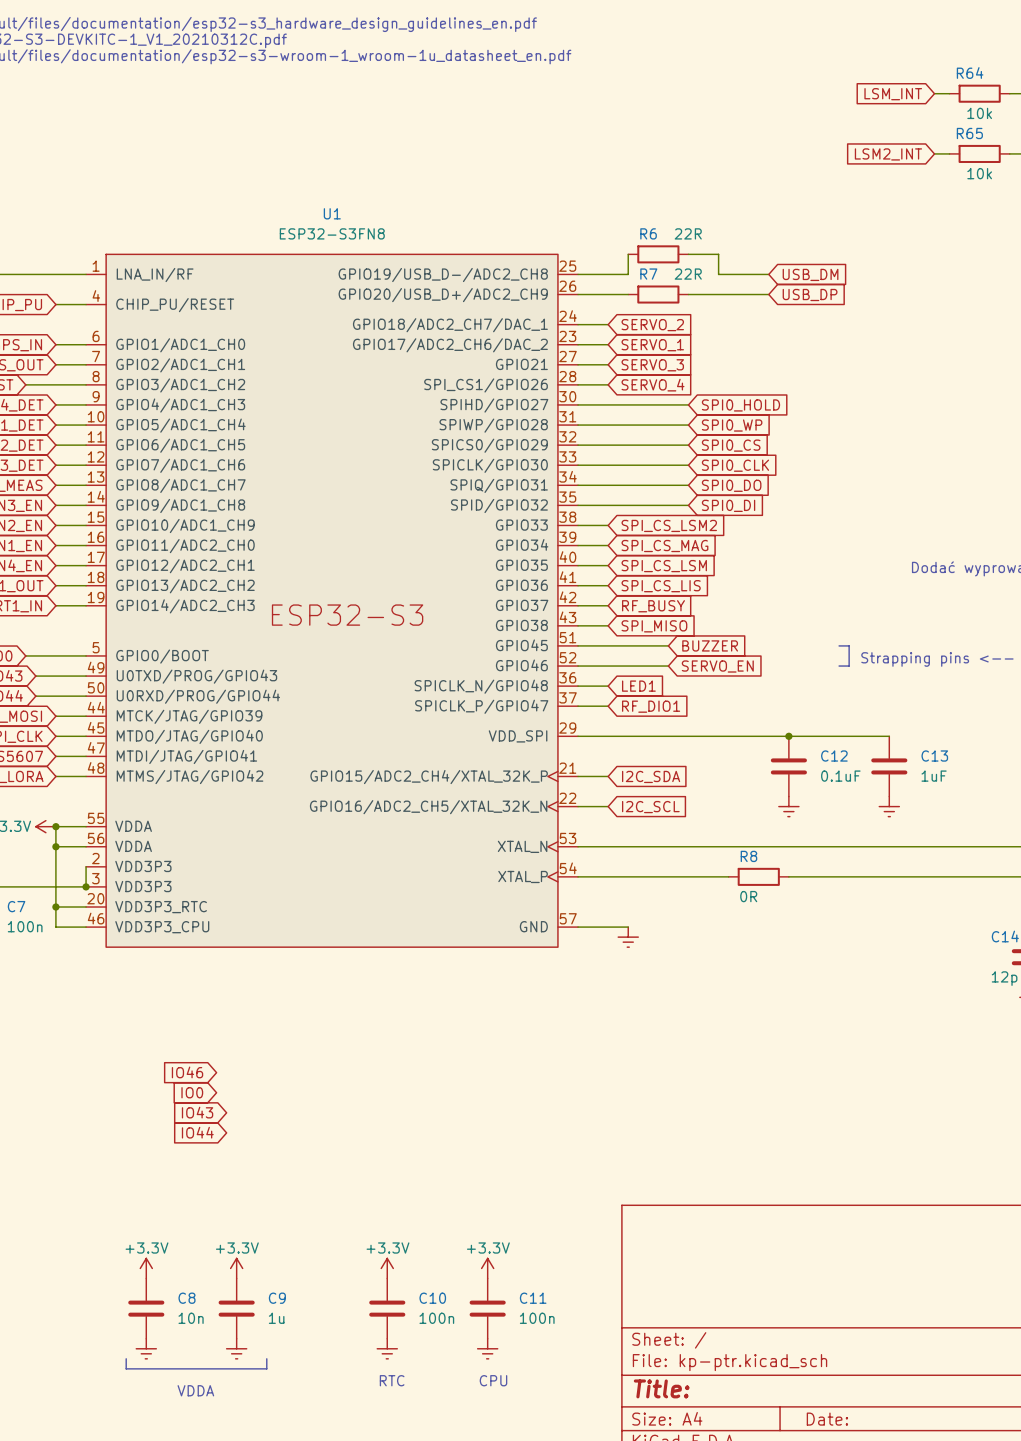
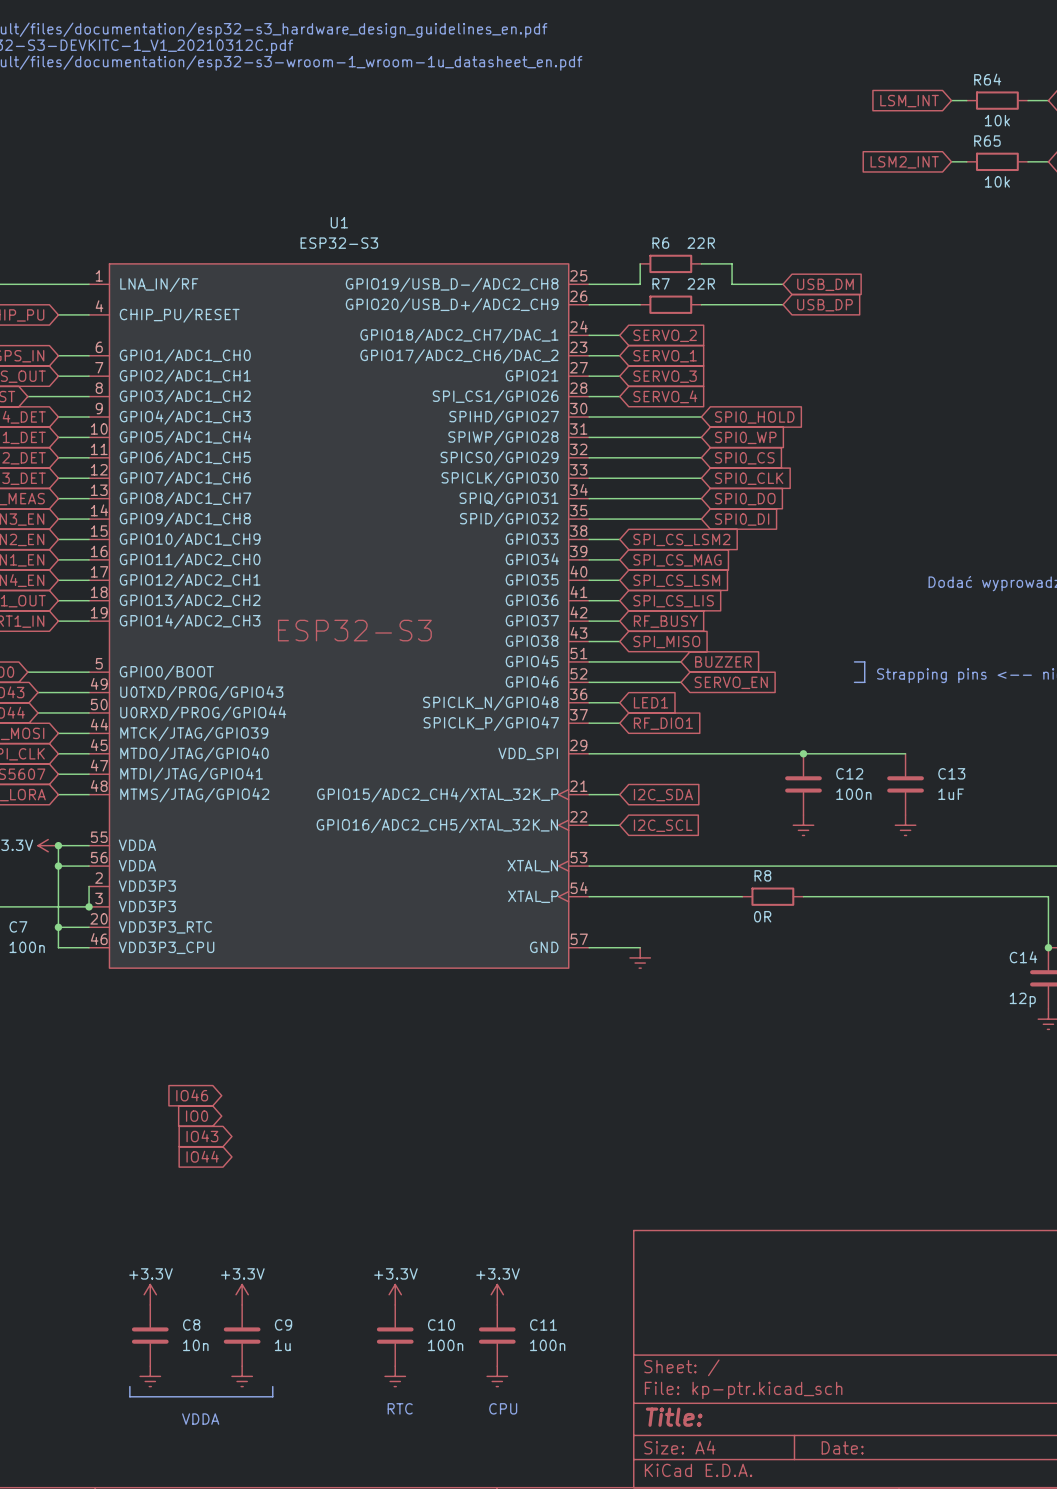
U1 value: ESP32-S3FN8 (332, 233) -> ESP32-S3 (339, 243)
C12 value: 0.1uF (840, 776) -> 100n (853, 794)

